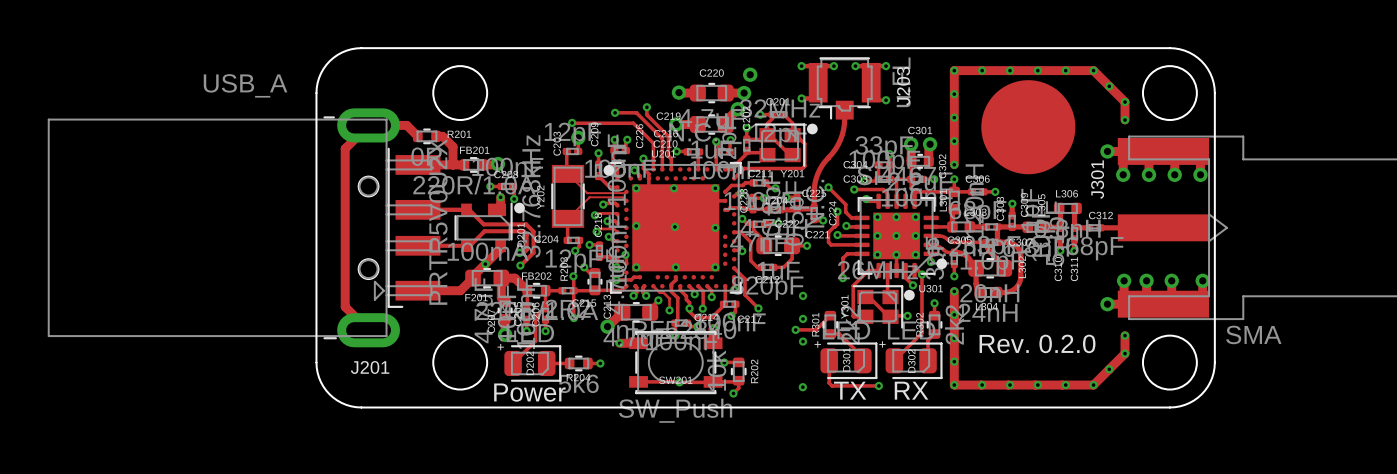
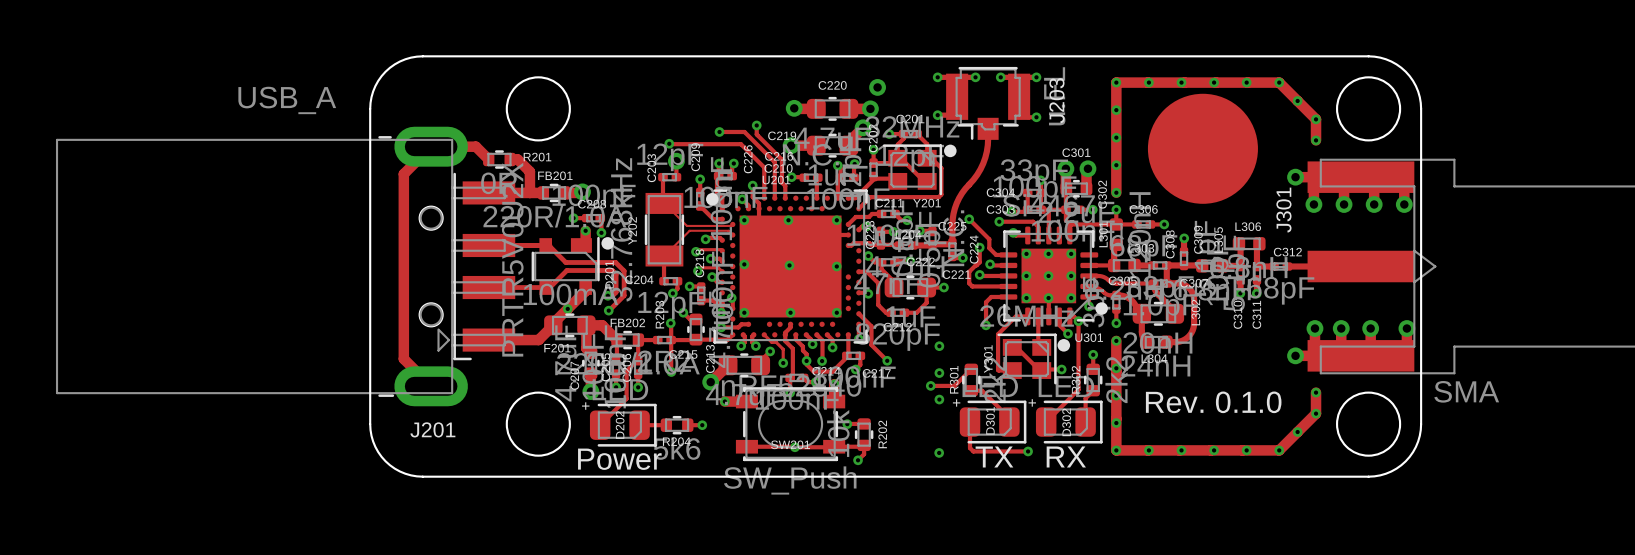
text: Rev. 0.2.0 (1037, 343) -> Rev. 0.1.0 (1213, 402)

